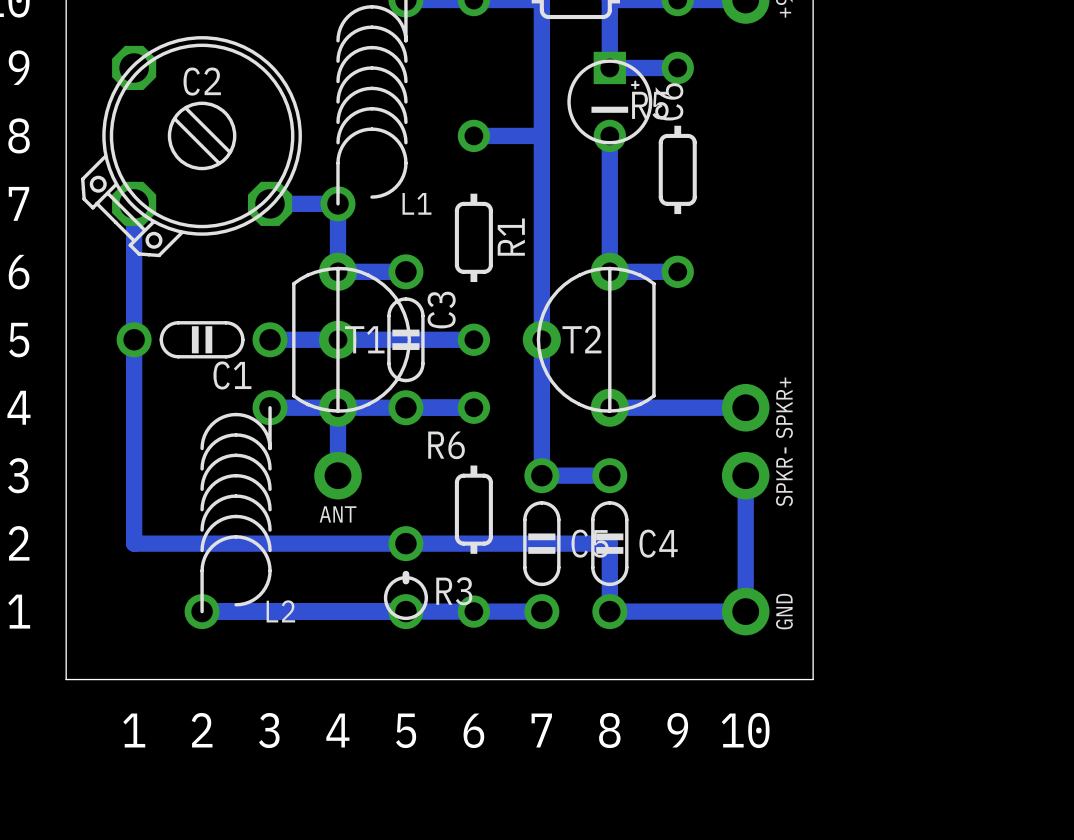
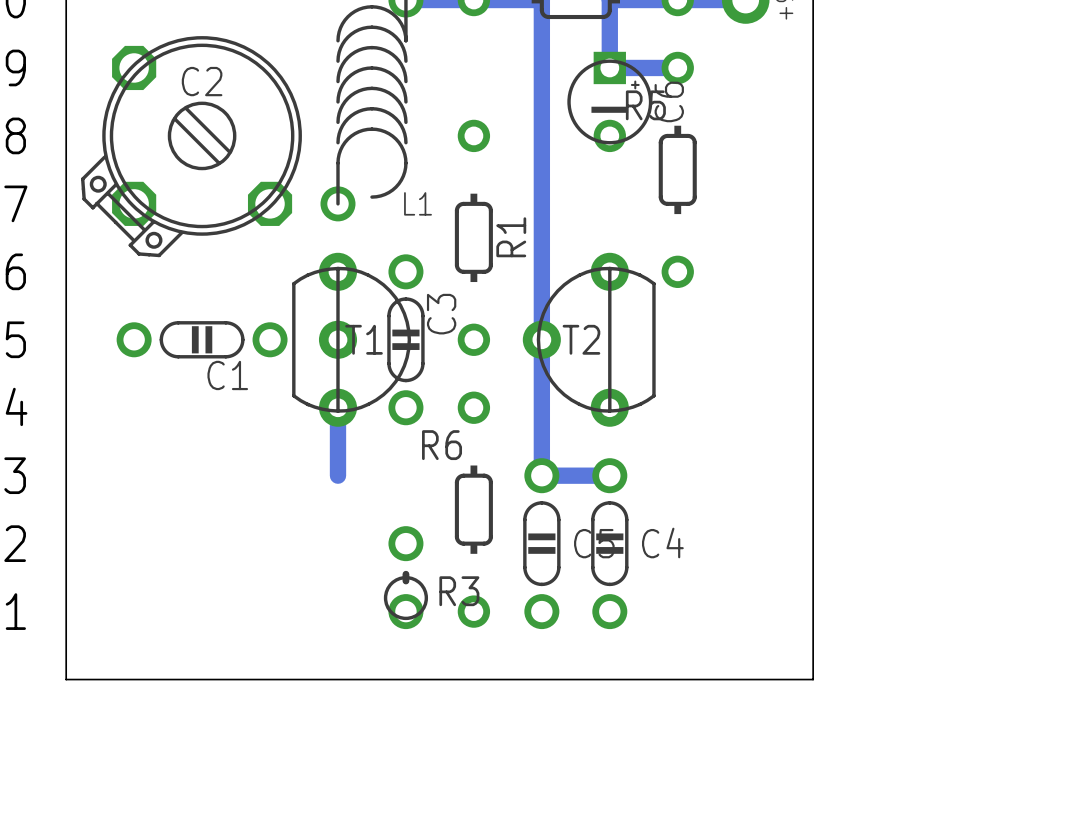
bottom track: (473, 135) (541, 135) -> none
bottom track: (609, 135) (609, 271) (677, 271) -> none
bottom track: (134, 203) (134, 543) (609, 543) (609, 611) (745, 611) (745, 475) -> none
bottom track: (270, 203) (337, 203) (337, 271) (405, 271) -> none
bottom track: (270, 339) (473, 339) -> none
bottom track: (270, 407) (473, 407) -> none
bottom track: (609, 407) (745, 407) -> none
SPKR+: (745, 407) -> none
ANT: (337, 475) -> none
SPKR-: (745, 475) -> none
L2: (236, 509) -> none
bottom track: (202, 611) (541, 611) -> none
GND: (745, 611) -> none
text: 1 (134, 730) -> none
text: 2 (202, 730) -> none
text: 3 (269, 730) -> none
text: 4 (337, 730) -> none
text: 5 (406, 730) -> none
text: 6 (473, 730) -> none
text: 7 (541, 730) -> none
text: 8 (609, 730) -> none
text: 9 (677, 730) -> none
text: 10 (745, 730) -> none

